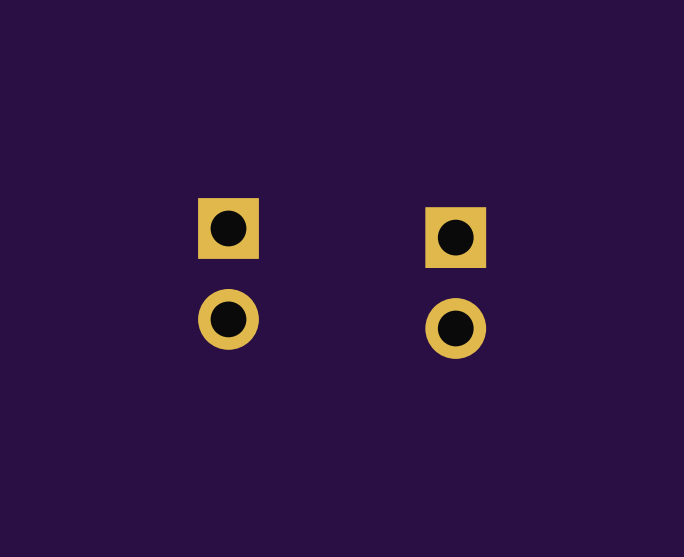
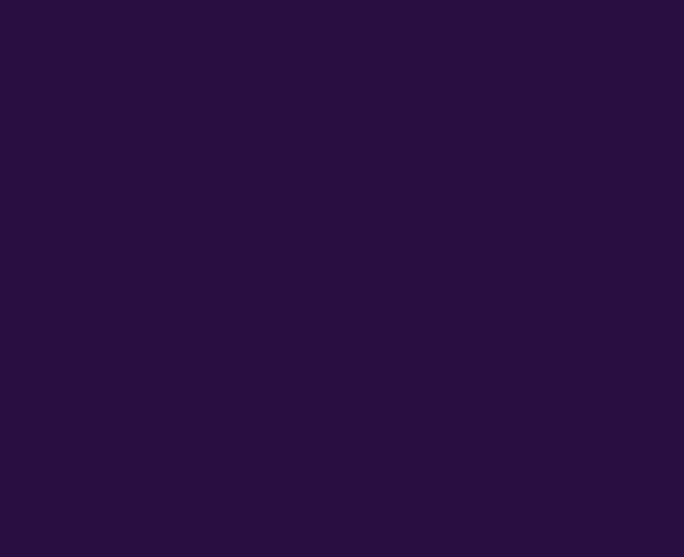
part: (228, 273) -> none
part: (455, 283) -> none

